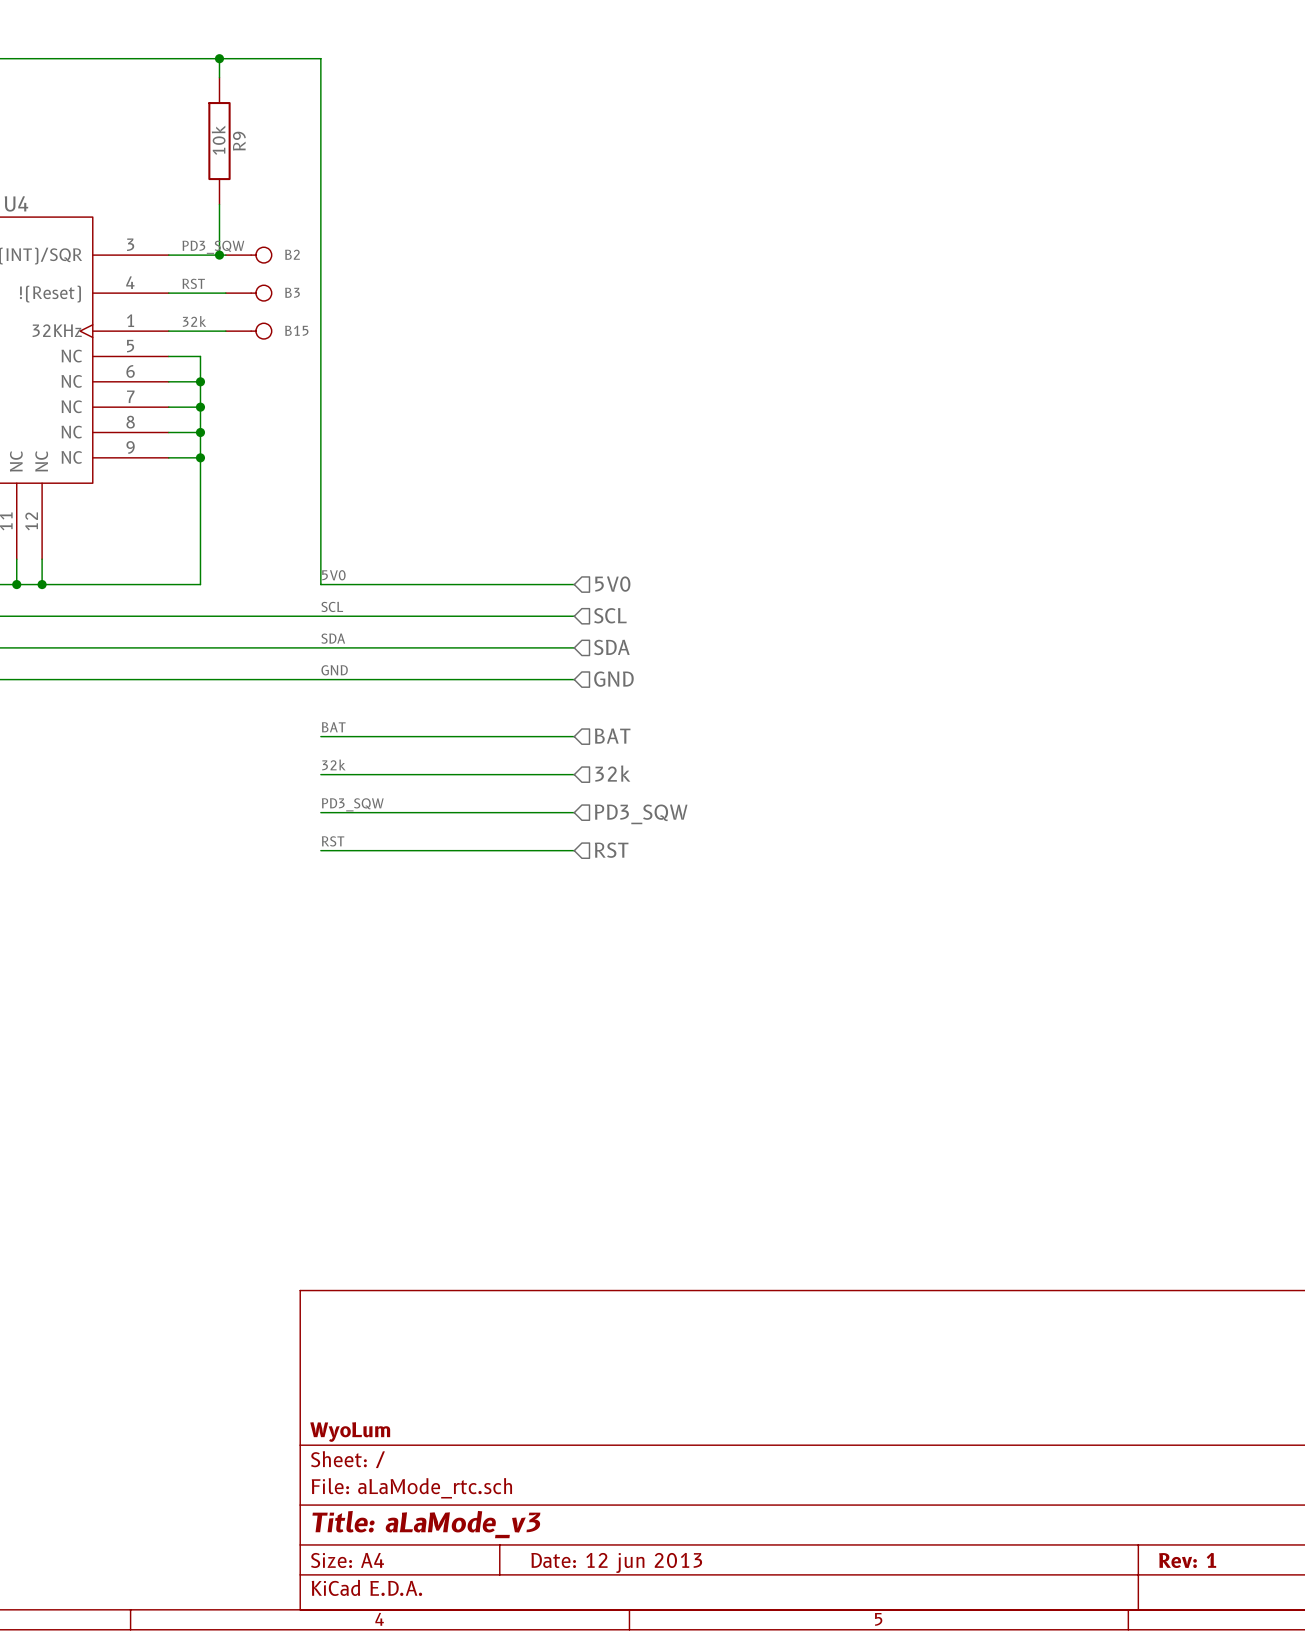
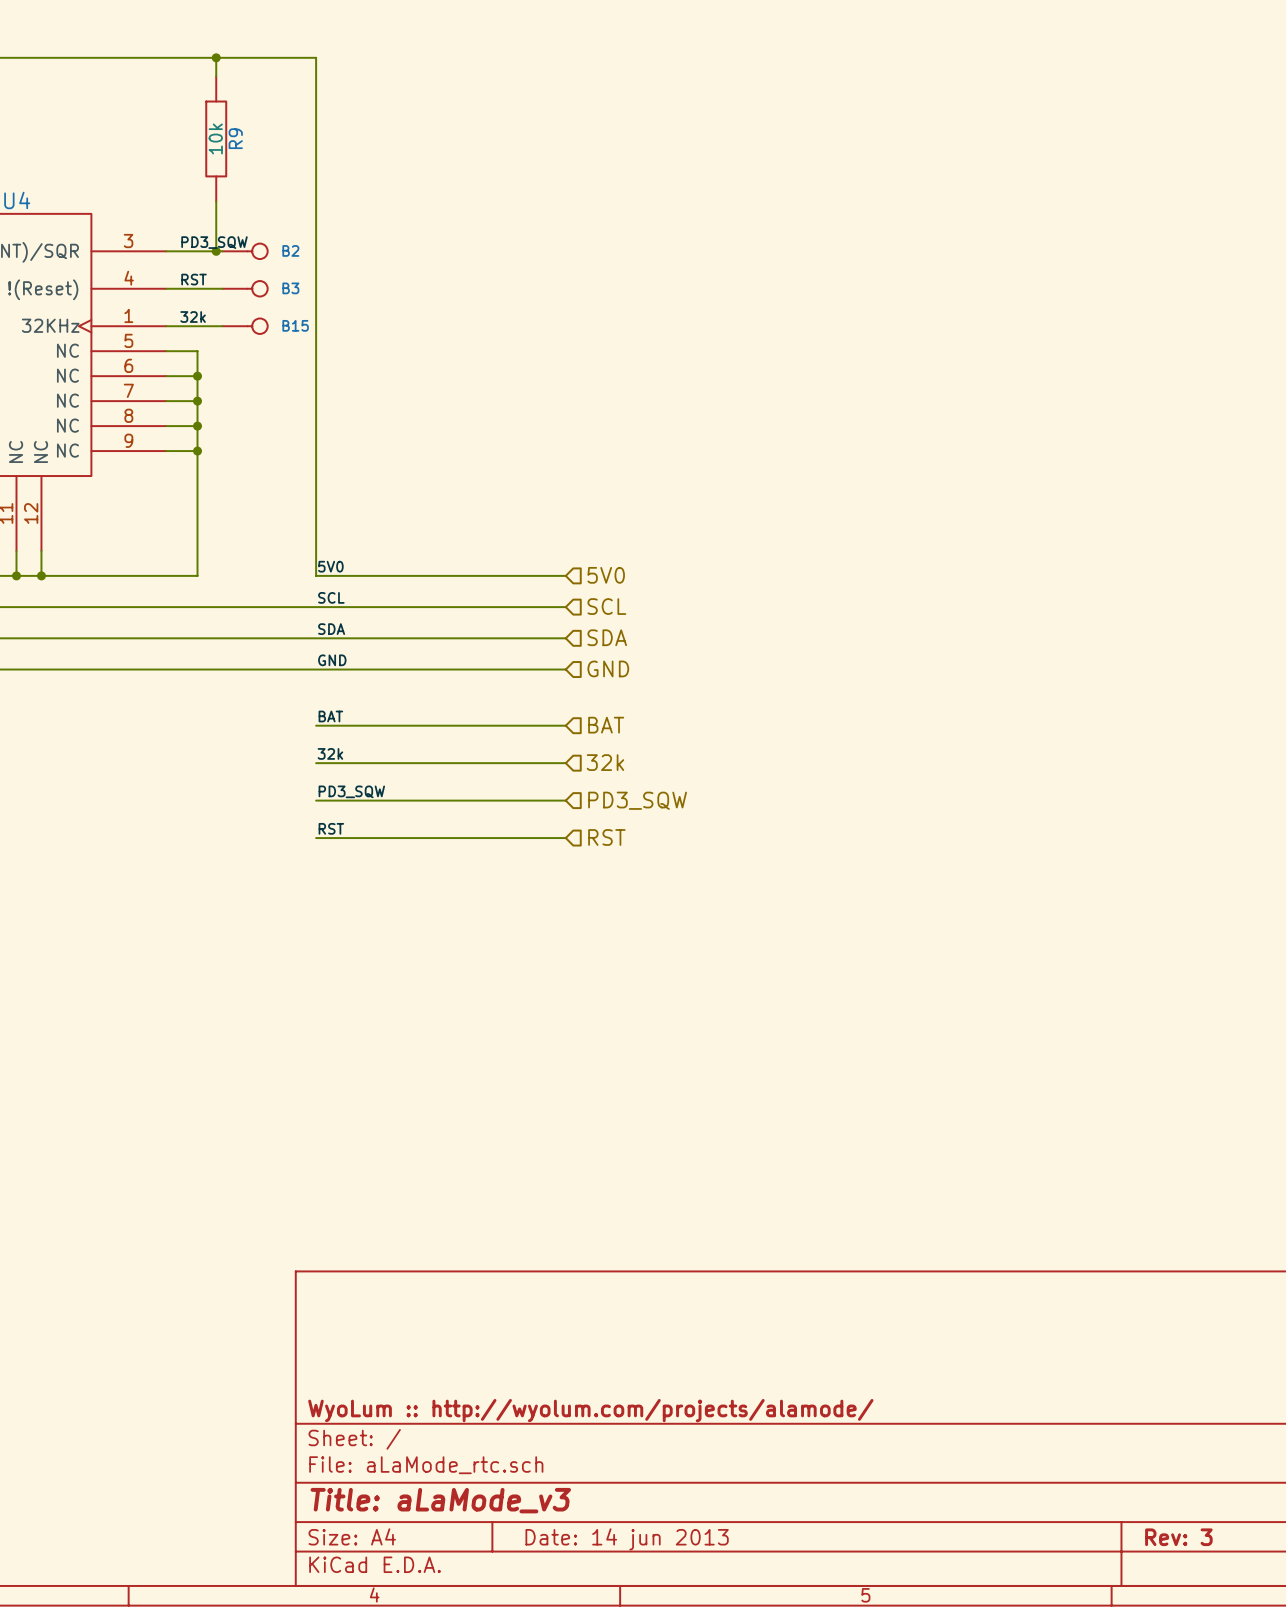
title block: WyoLum (350, 1432) -> WyoLum :: http://wyolum.com/projects/alamode/ (590, 1410)
title block: Rev: 1 (1187, 1560) -> Rev: 3 (1178, 1537)
title block: Date: 12 jun 2013 (616, 1562) -> Date: 14 jun 2013 (627, 1539)

